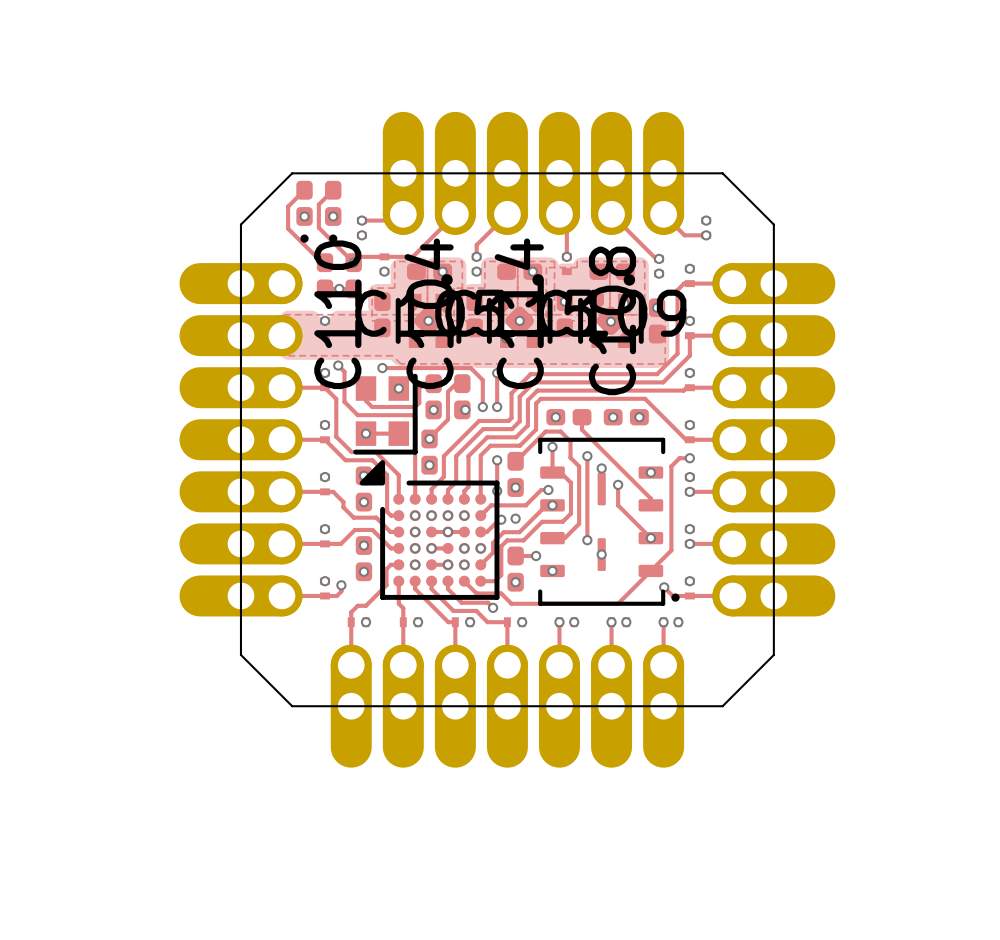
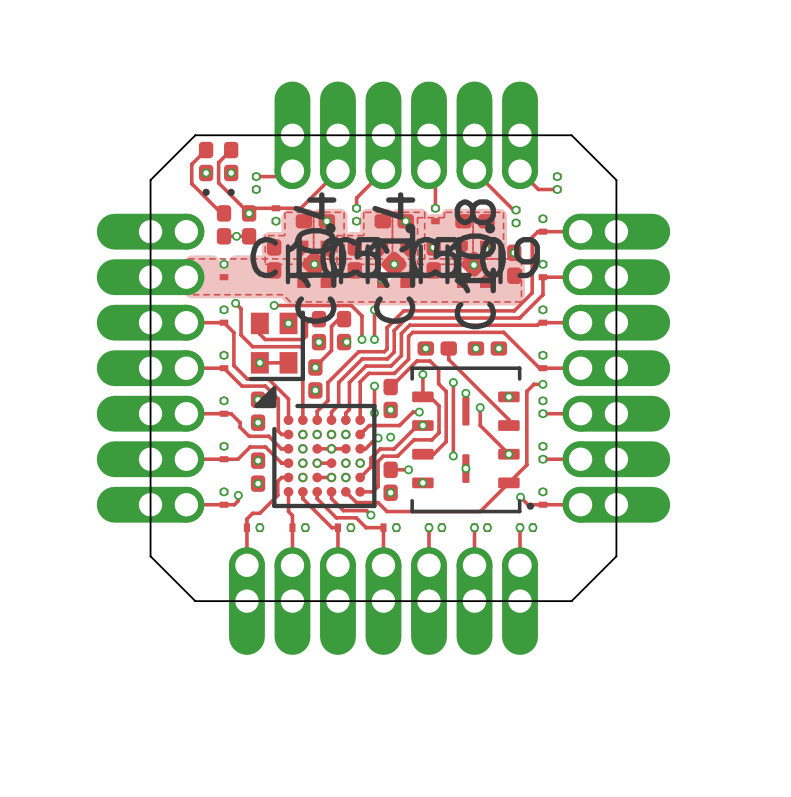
C110 name: C110 (337, 314) -> none

